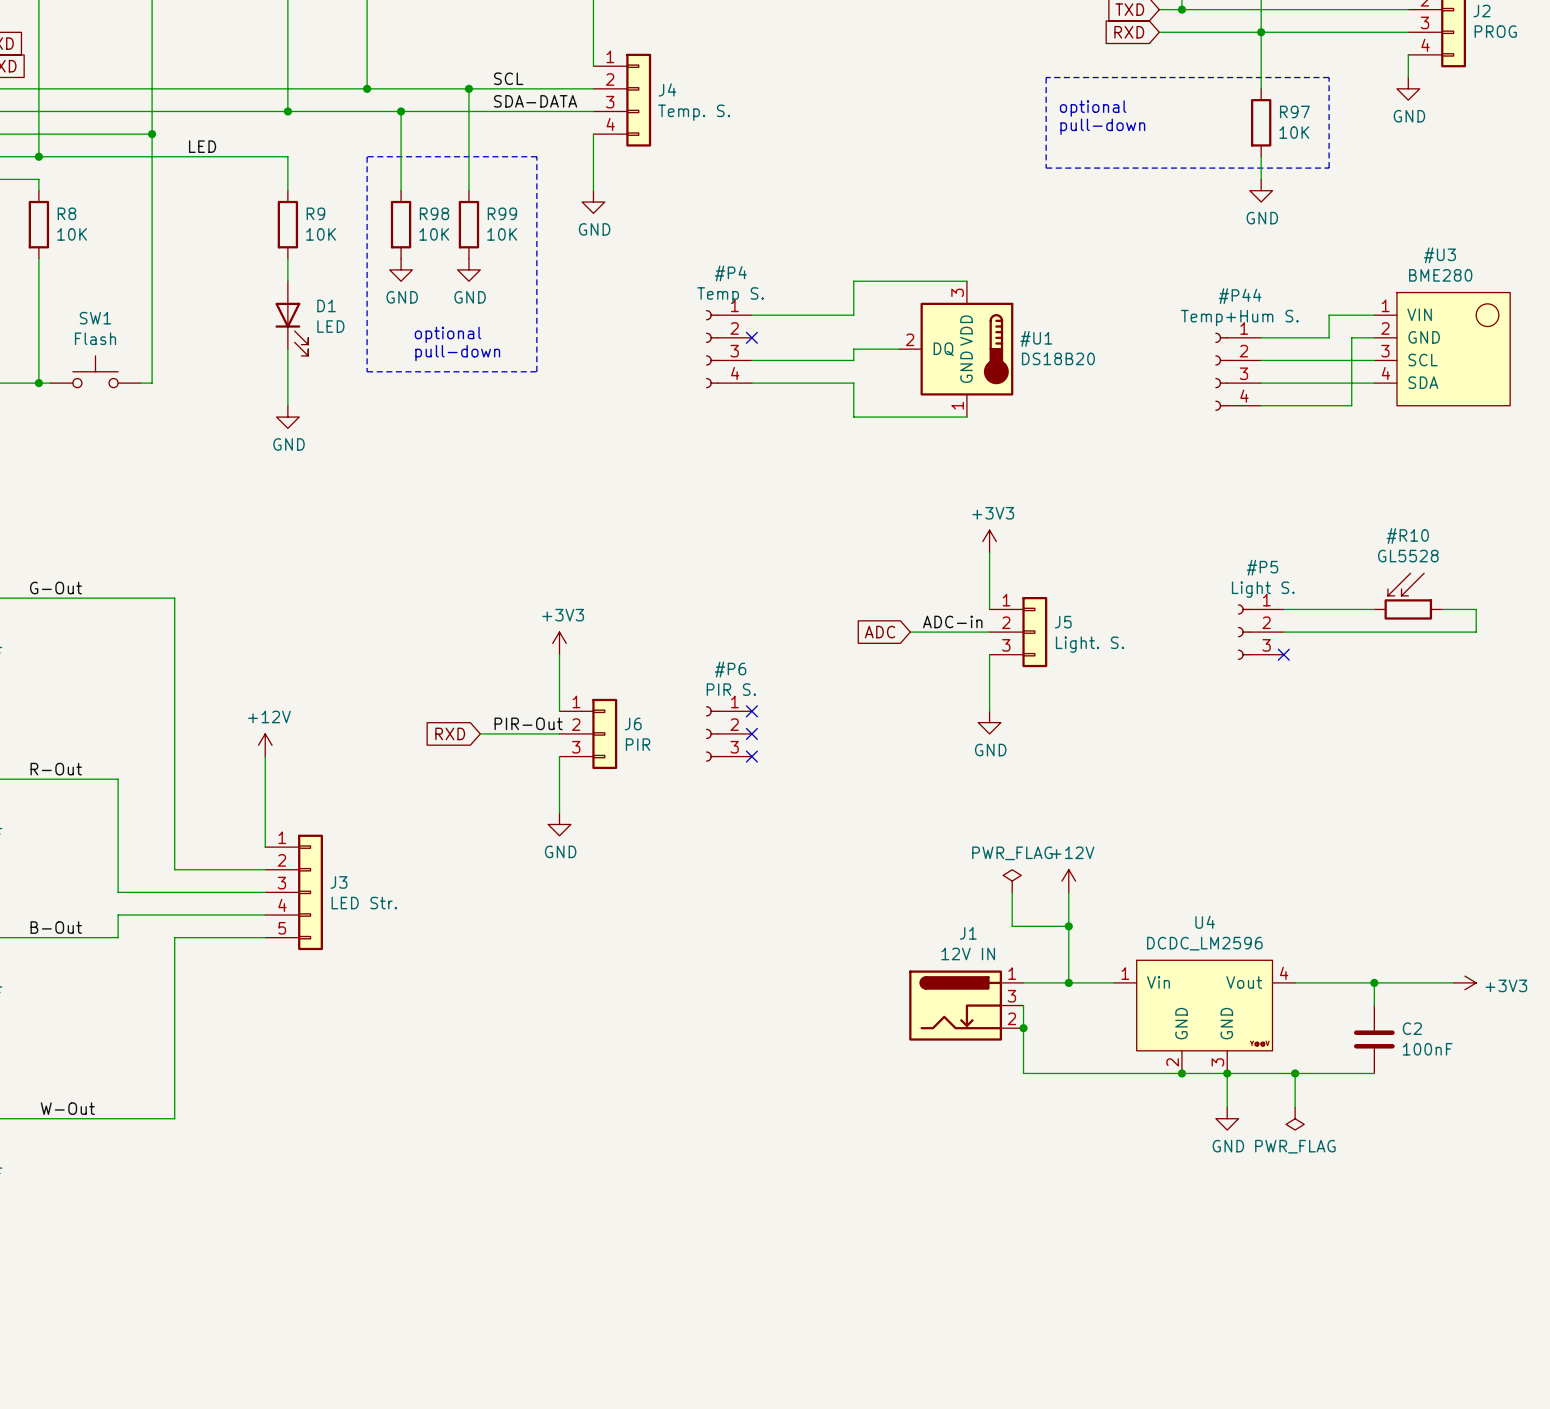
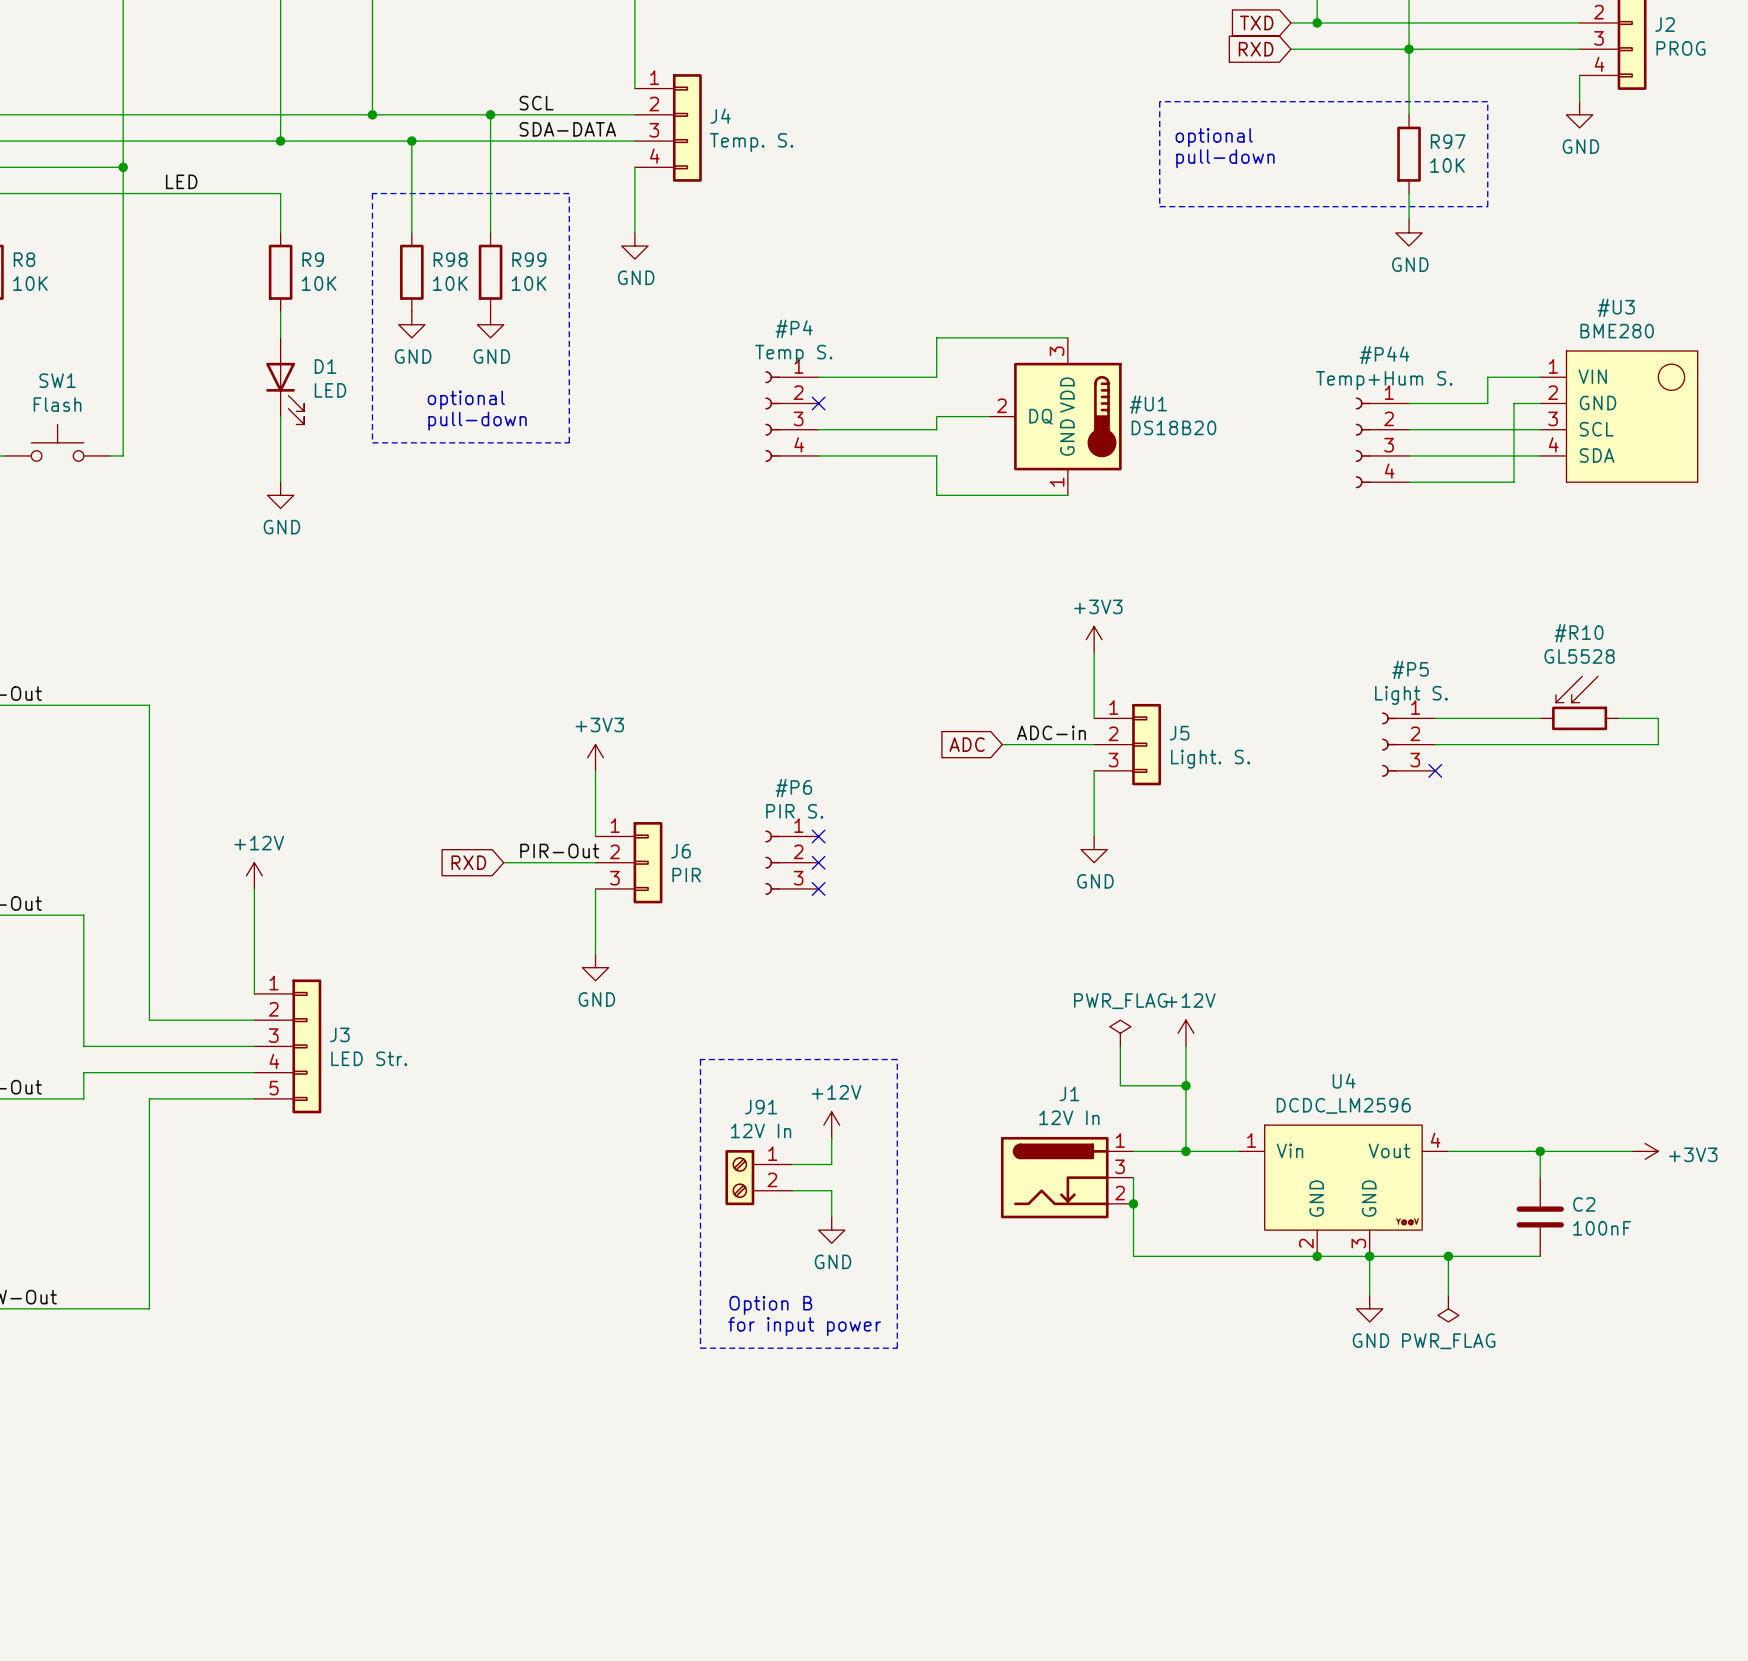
line: none -> (700, 1059) (700, 1348) (897, 1348) (897, 1059) (700, 1059)
J1 value: 12V IN (968, 953) -> 12V In (1069, 1117)
power symbol: none -> +12V (831, 1125)
wire: none -> (831, 1138) (831, 1164) (792, 1164)
J91: none -> 12V In (758, 1177)
wire: none -> (792, 1190) (831, 1190) (831, 1216)
power symbol: none -> GND (831, 1230)
text: none -> Option B (770, 1305)
text: none -> for input power (804, 1326)

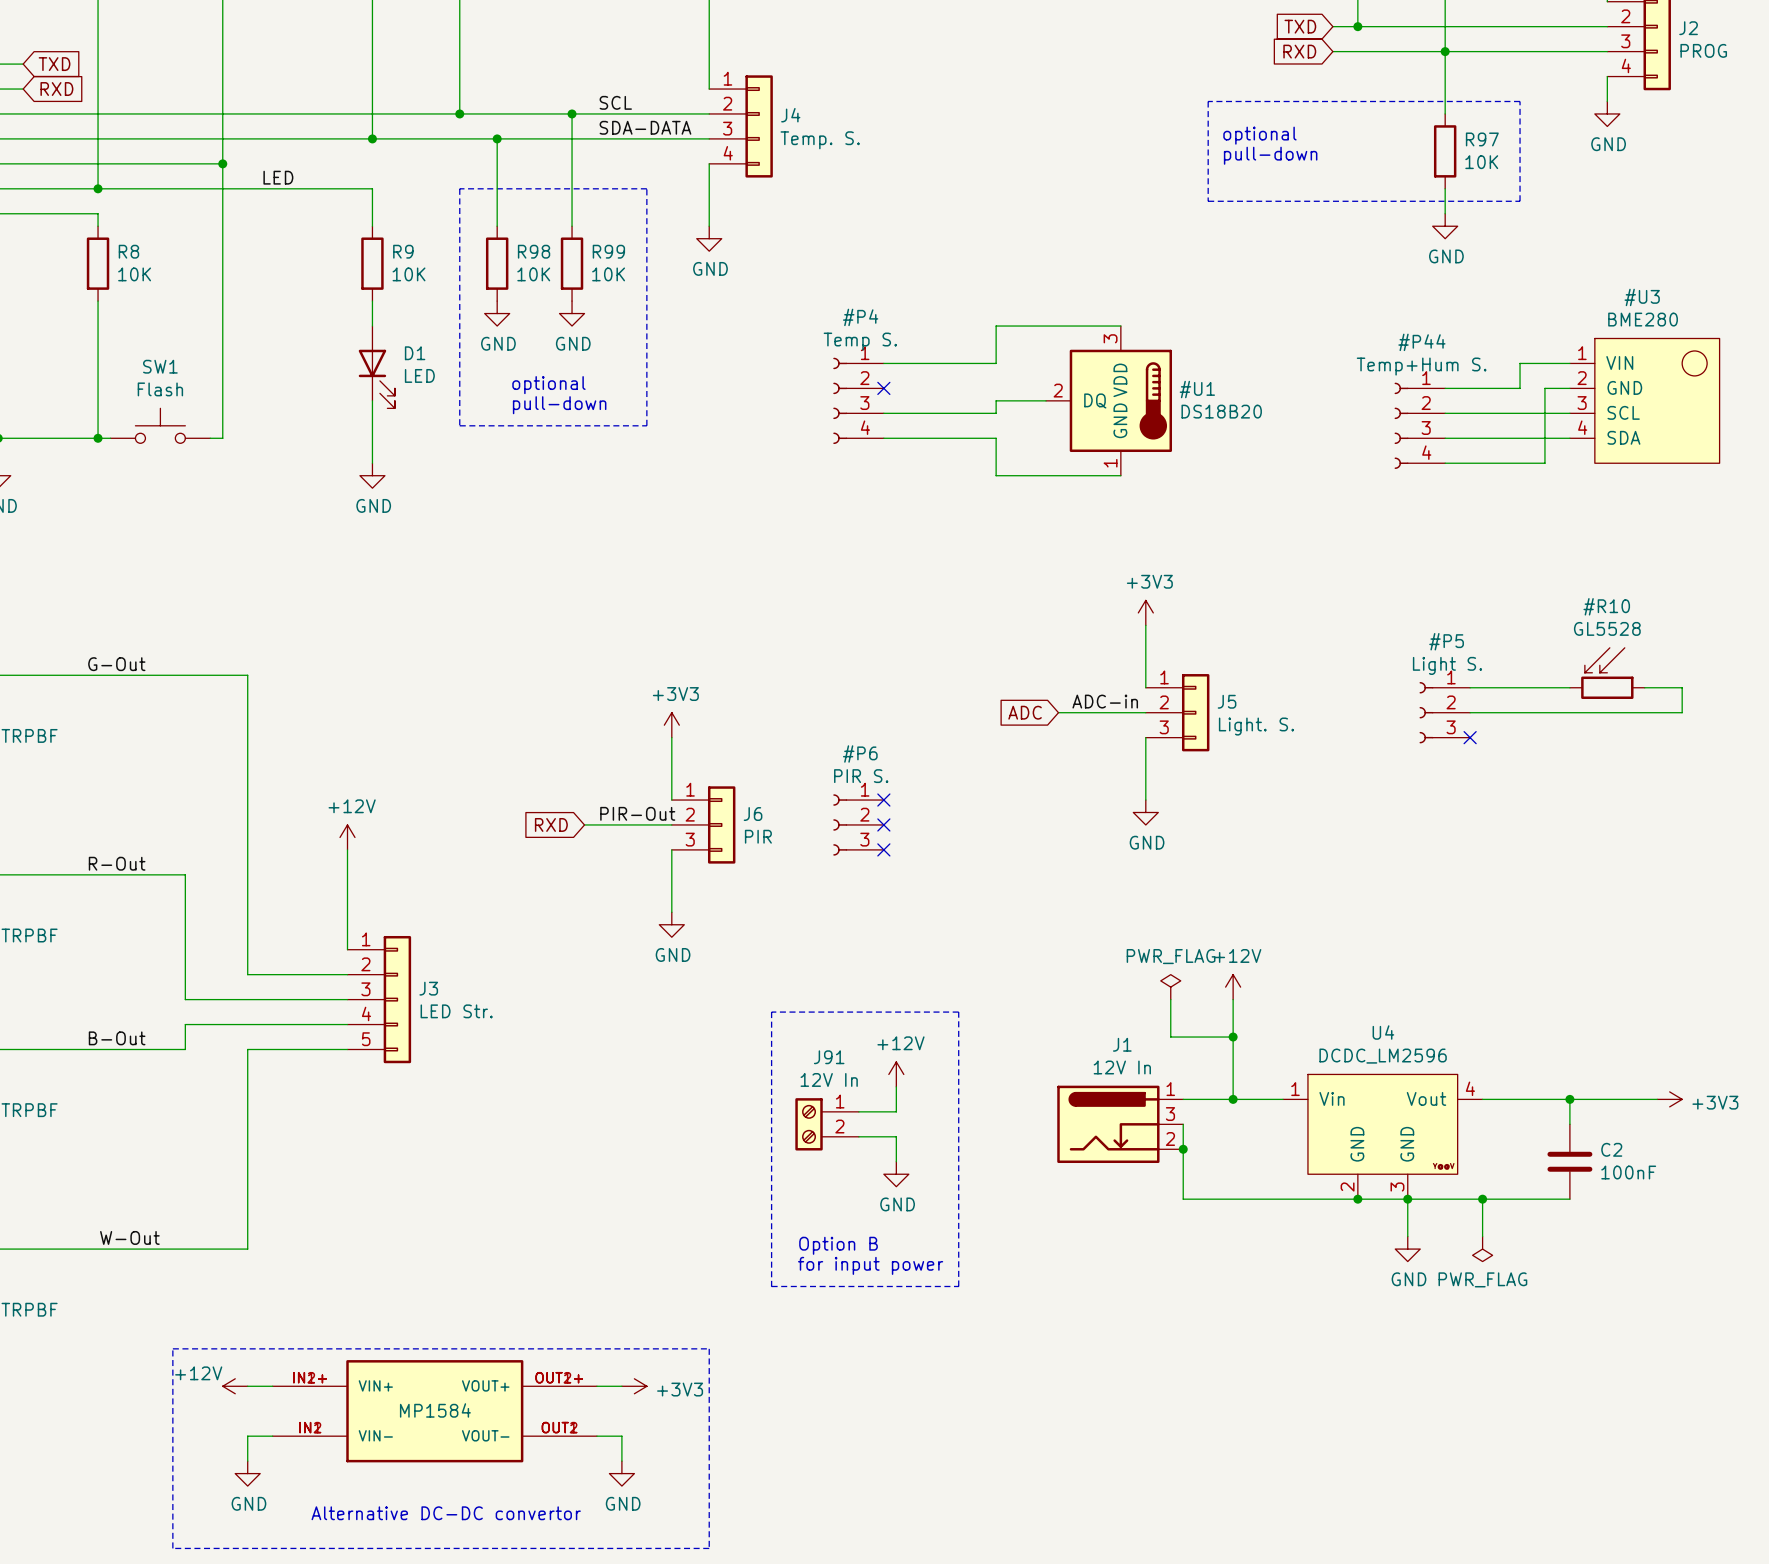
line: none -> (172, 1348) (709, 1348) (709, 1548) (172, 1548) (172, 1348)
power symbol: none -> +12V (235, 1386)
wire: none -> (247, 1386) (272, 1386)
wire: none -> (596, 1386) (621, 1386)
power symbol: none -> +3V3 (634, 1386)
part: none -> MP1584 (434, 1411)
wire: none -> (272, 1436) (247, 1436) (247, 1461)
wire: none -> (596, 1436) (621, 1436) (621, 1461)
power symbol: none -> GND (247, 1473)
power symbol: none -> GND (621, 1473)
text: none -> Alternative DC-DC convertor (446, 1513)

